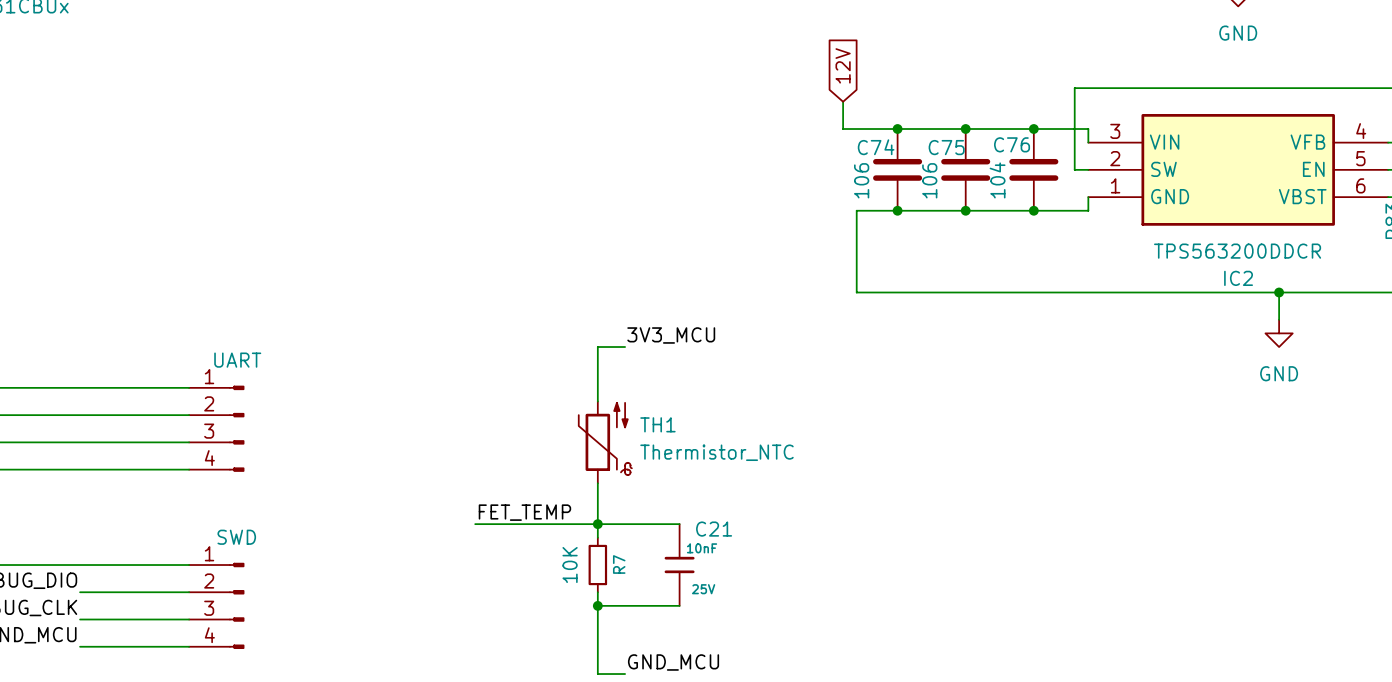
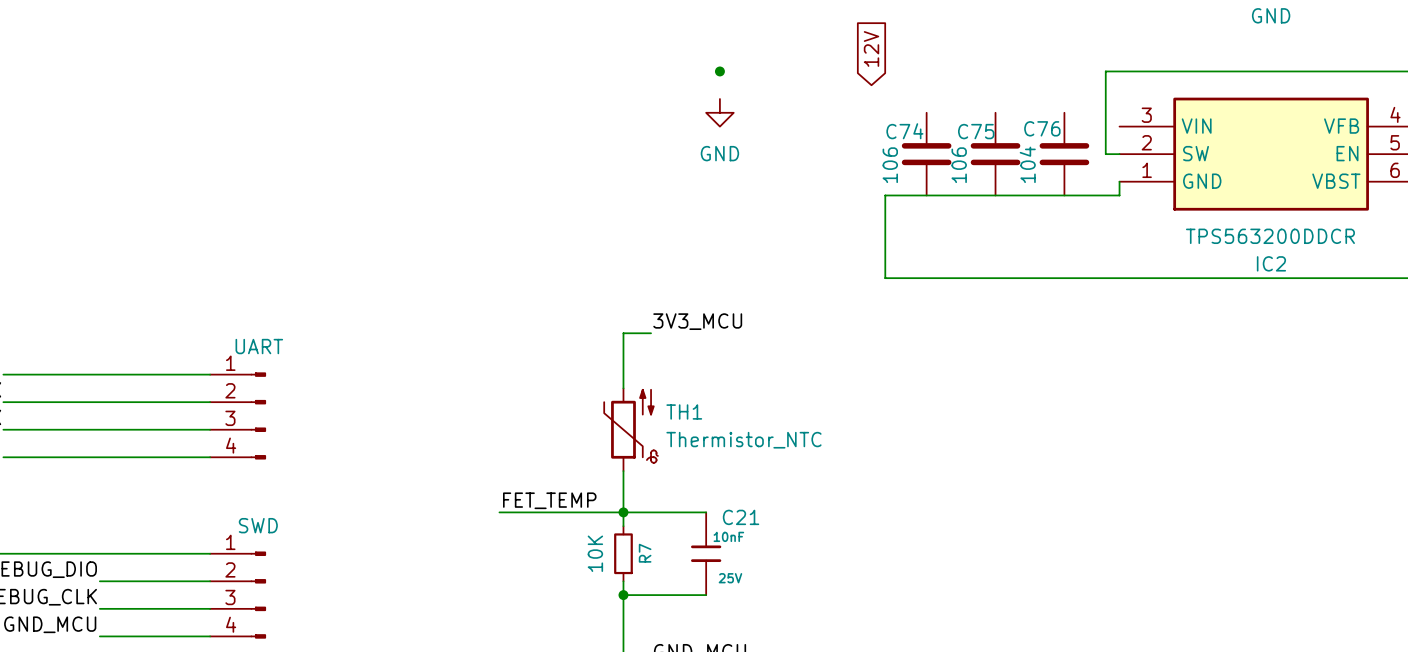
junction: none -> (719, 71)
wire: (843, 101) (843, 129) (1088, 129) (1088, 142) -> none
power symbol: none -> GND (719, 112)
junction: (897, 129) -> none
junction: (965, 129) -> none
junction: (1033, 129) -> none
junction: (897, 210) -> none
junction: (965, 210) -> none
junction: (1033, 210) -> none
wire: (1279, 292) (1279, 319) -> none
junction: (1279, 292) -> none
power symbol: GND (1279, 333) -> none

